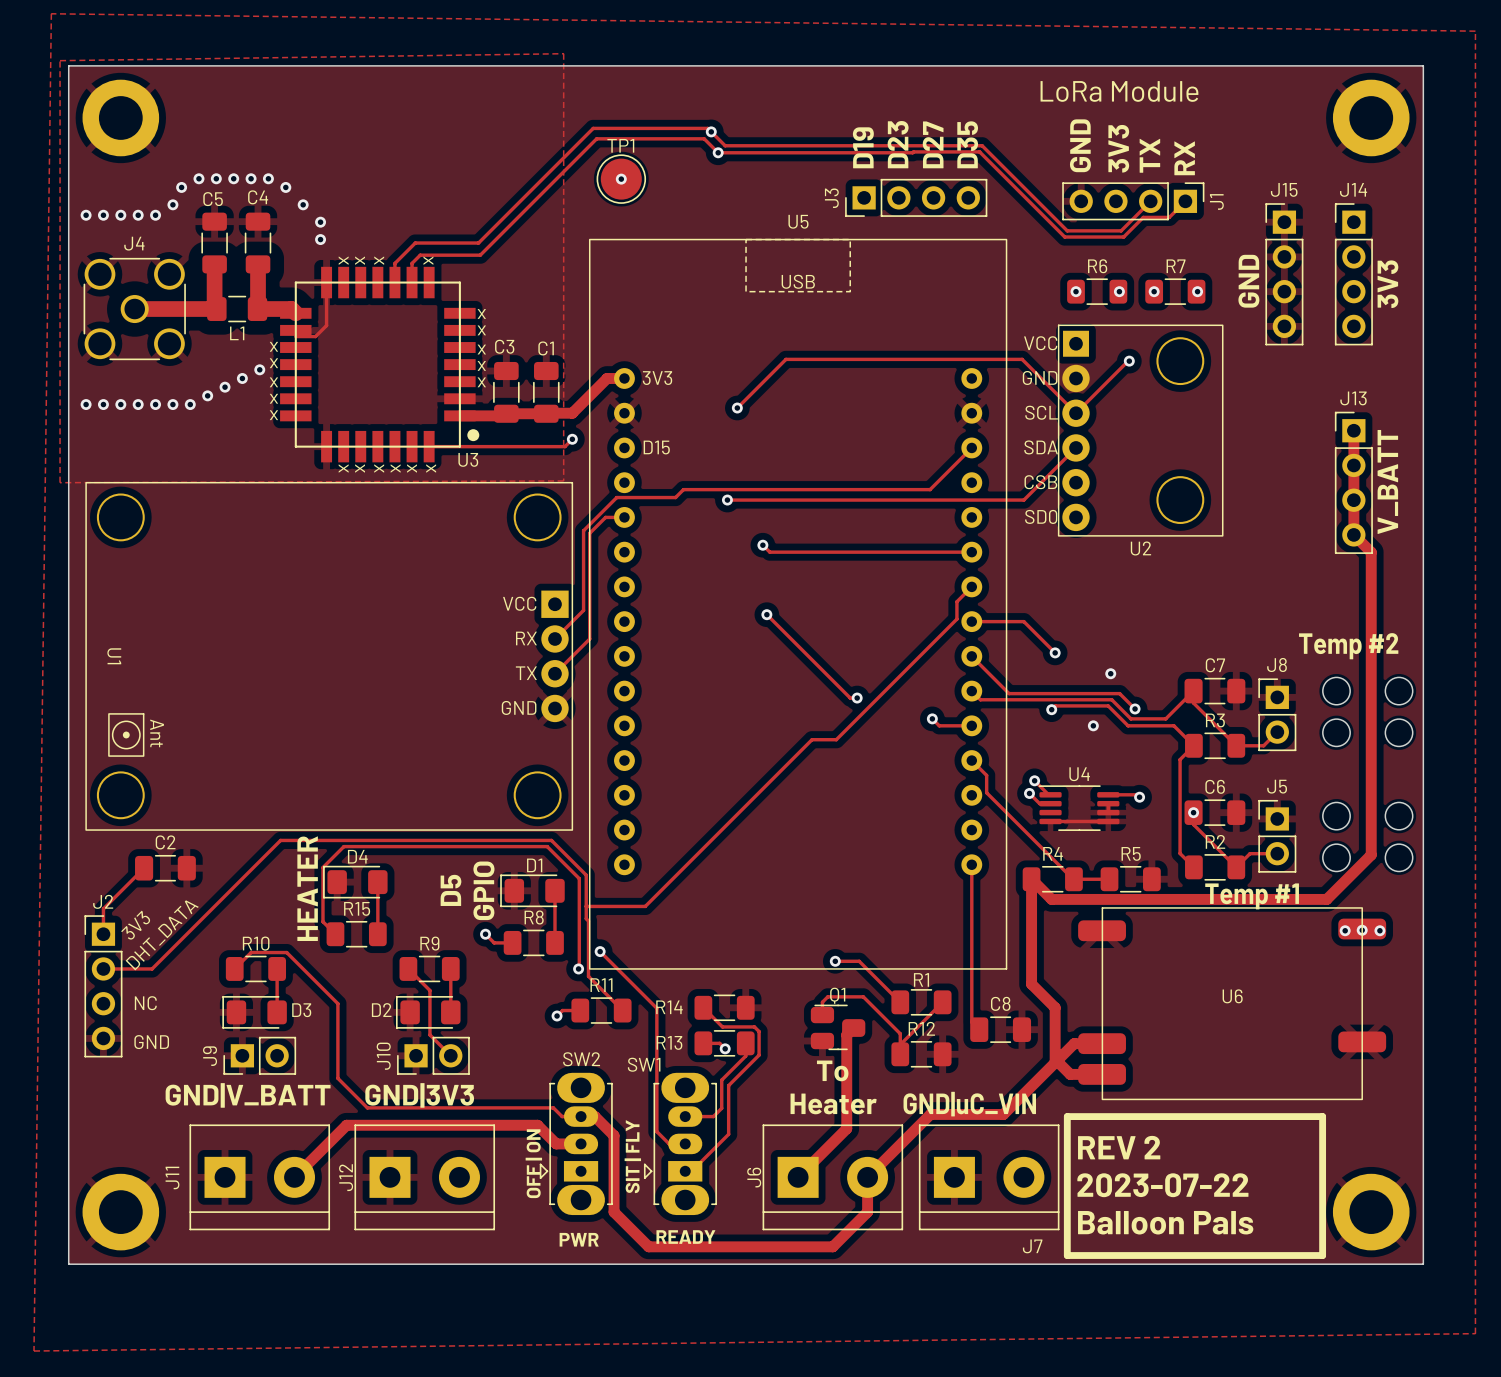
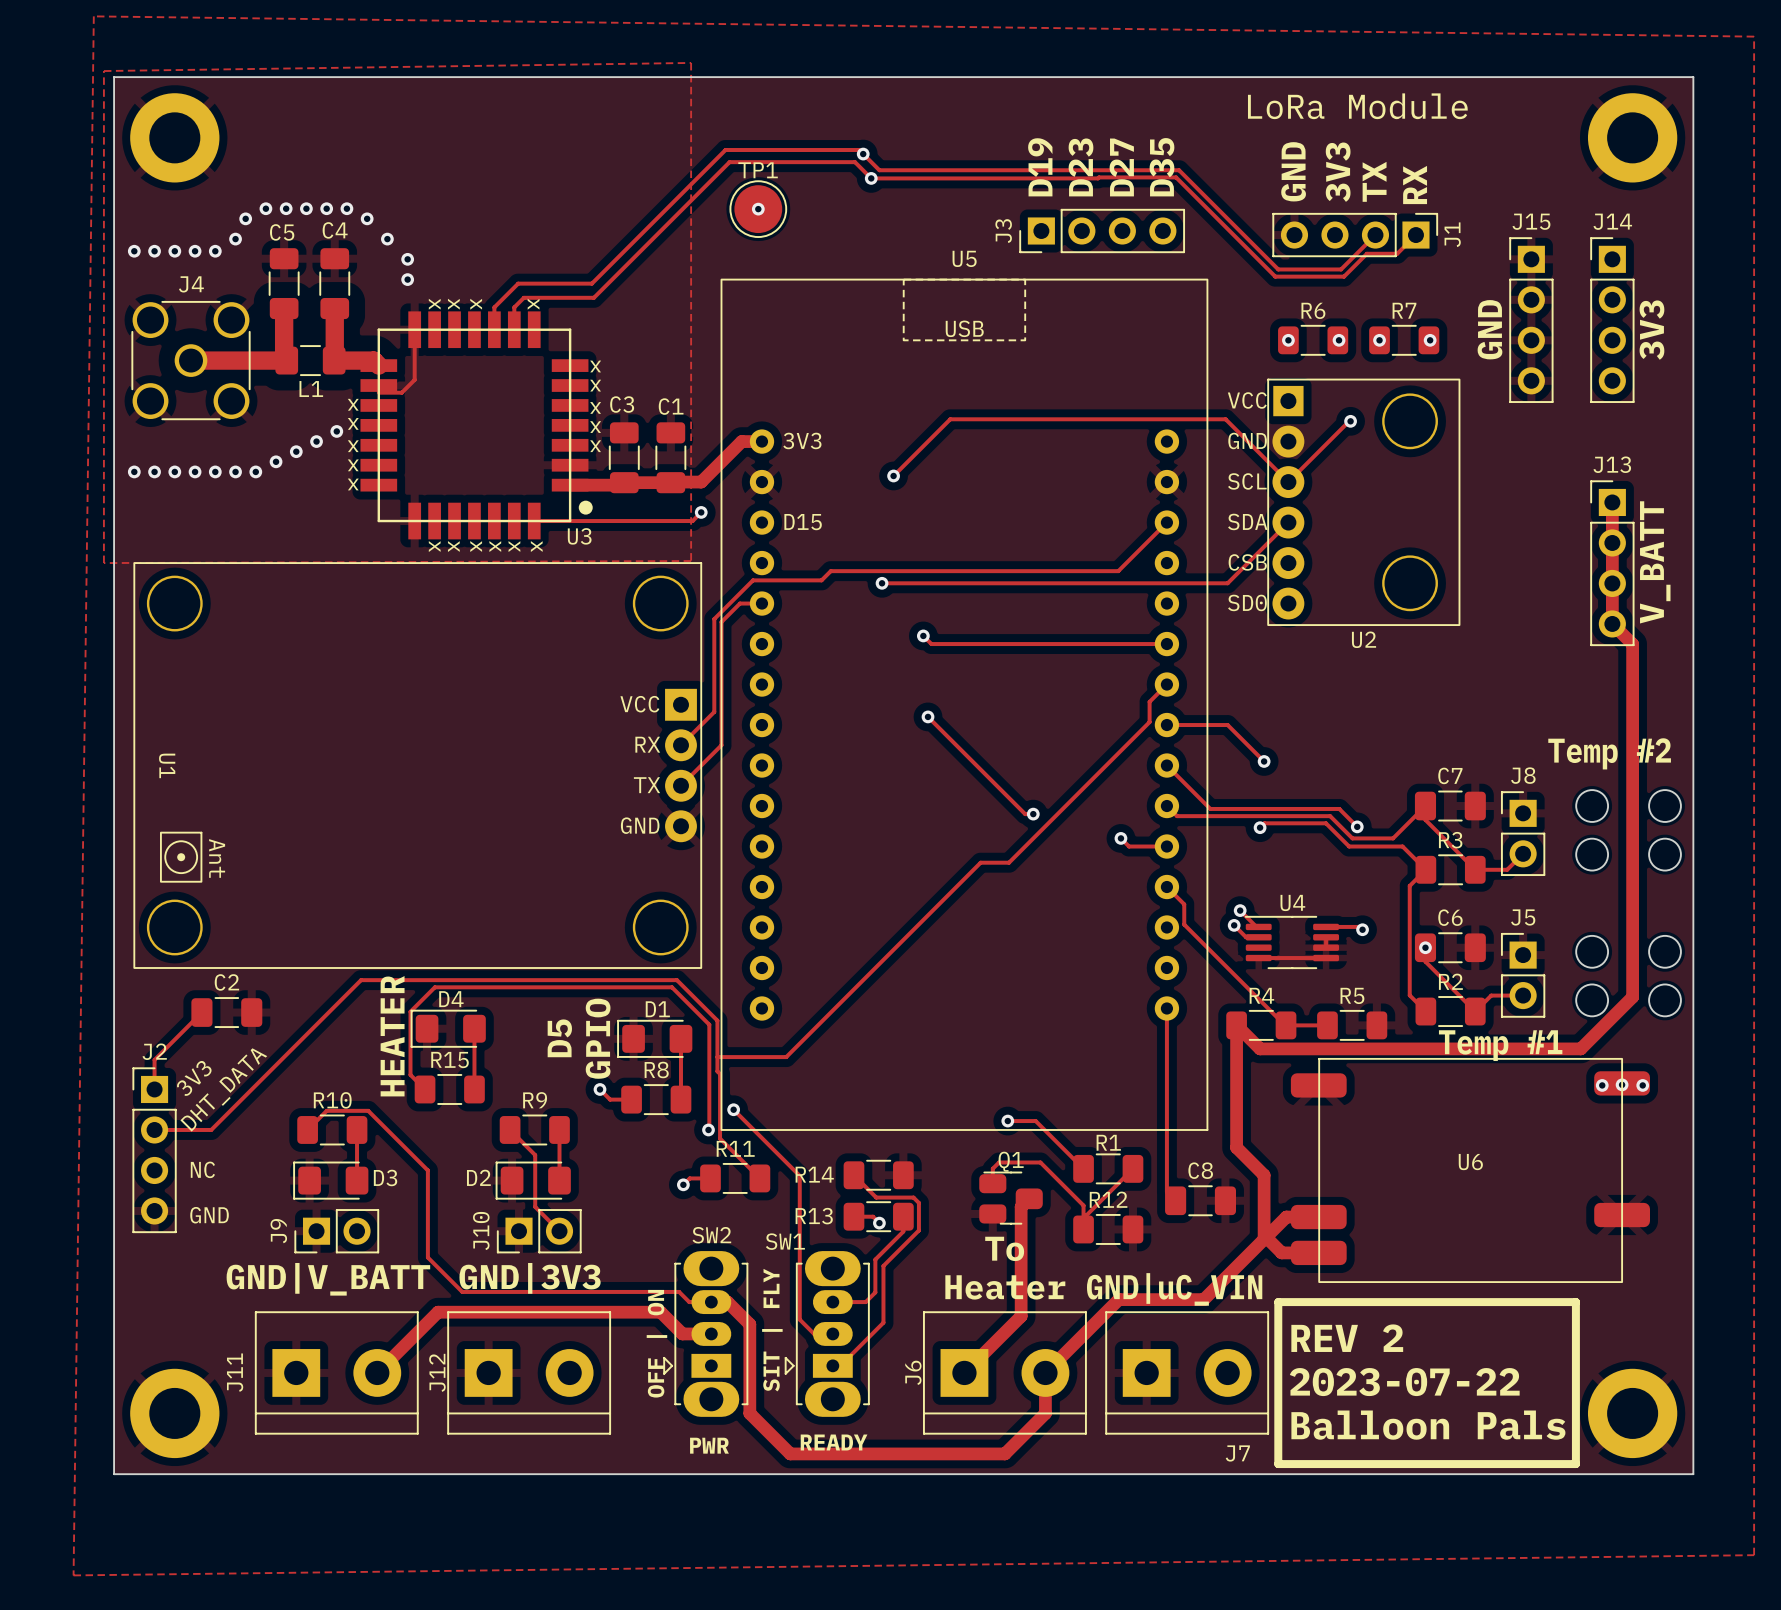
via: (1110, 673) -> none
via: (1093, 725) -> none

